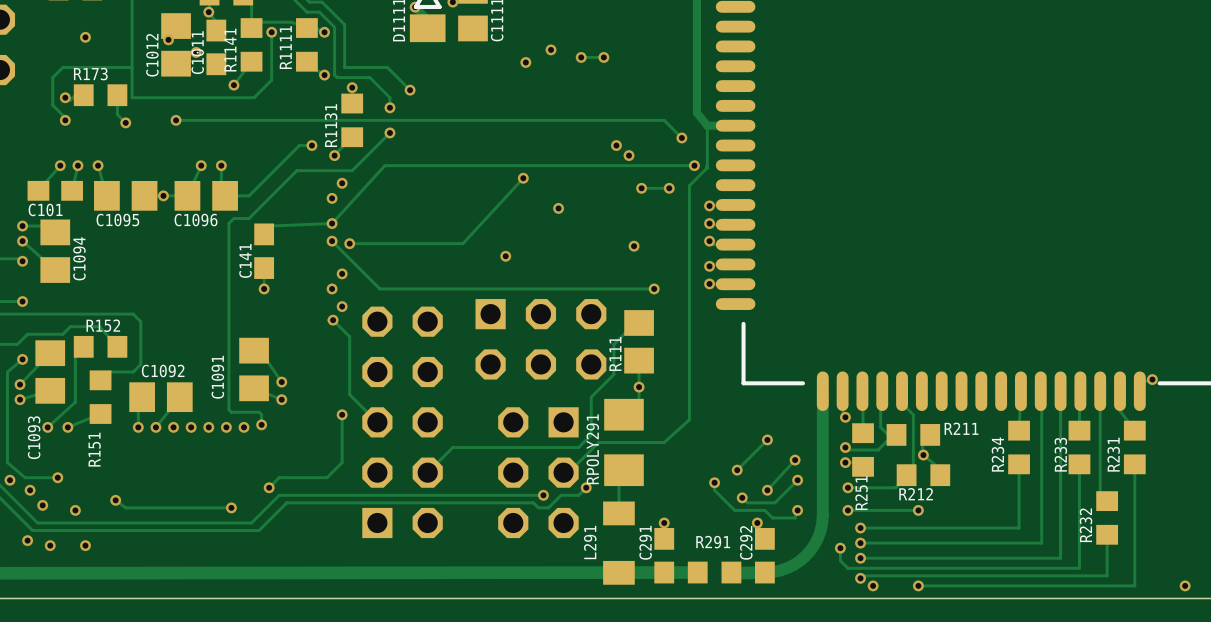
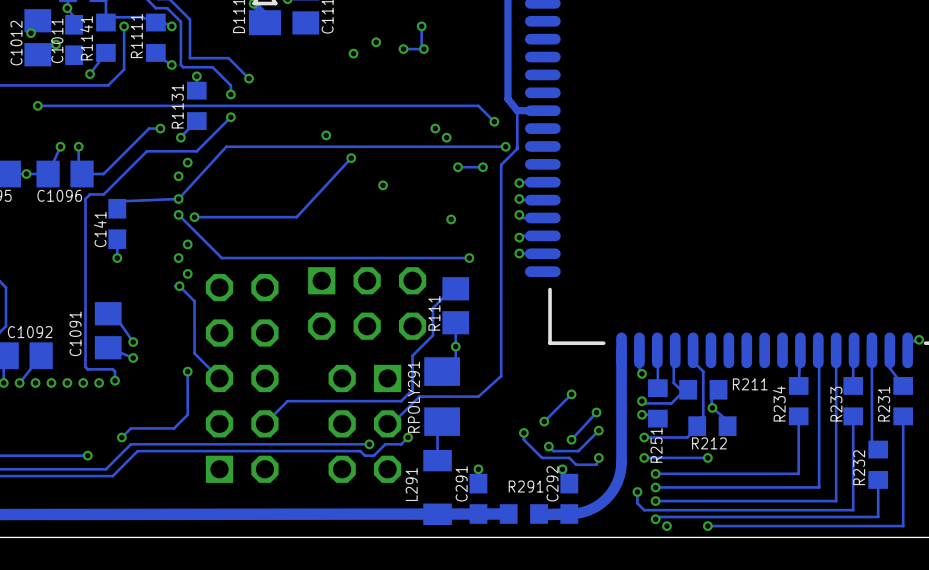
track: none -> (421, 26) (421, 49)
via: none -> (421, 26)
via position: (505, 256) -> (326, 135)

